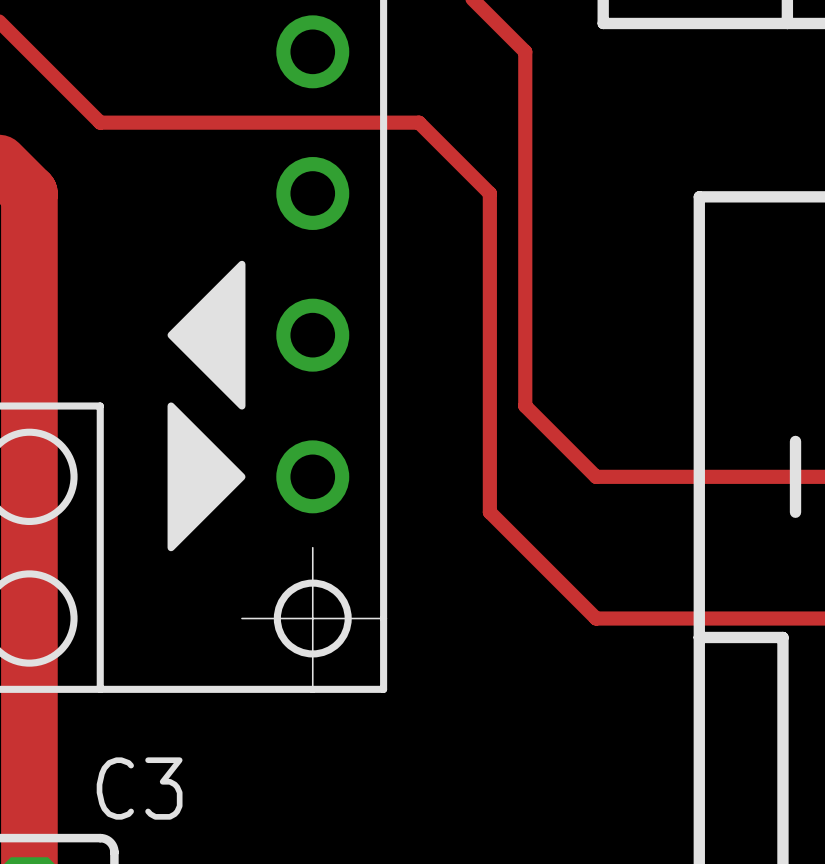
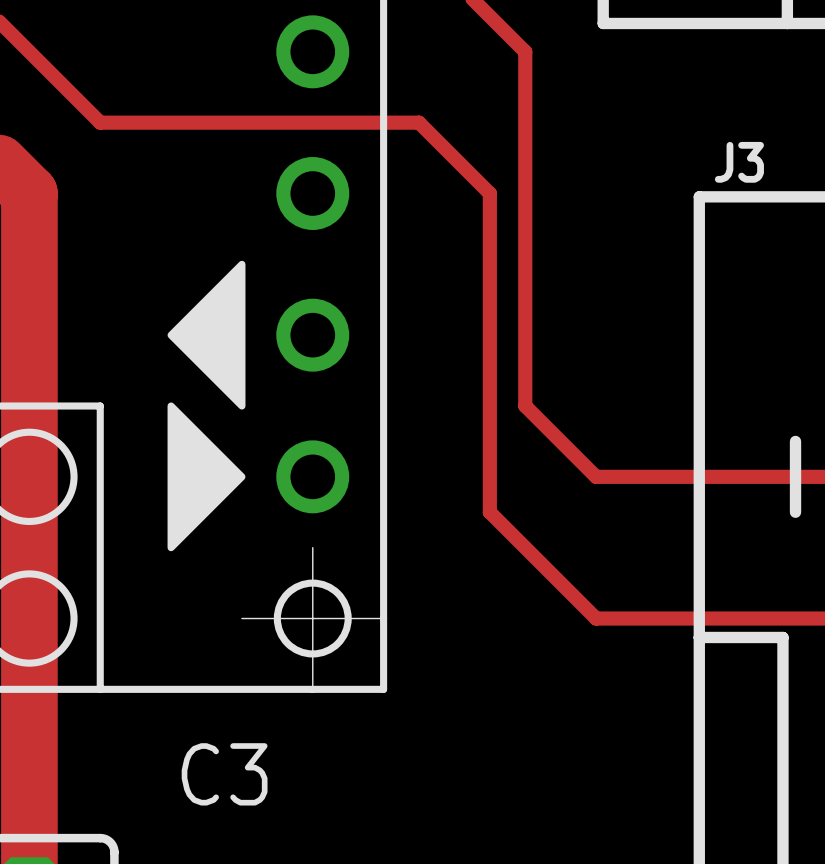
J3 name: none -> J3 (739, 162)
C3 name position: C3 (139, 788) -> C3 (224, 774)

